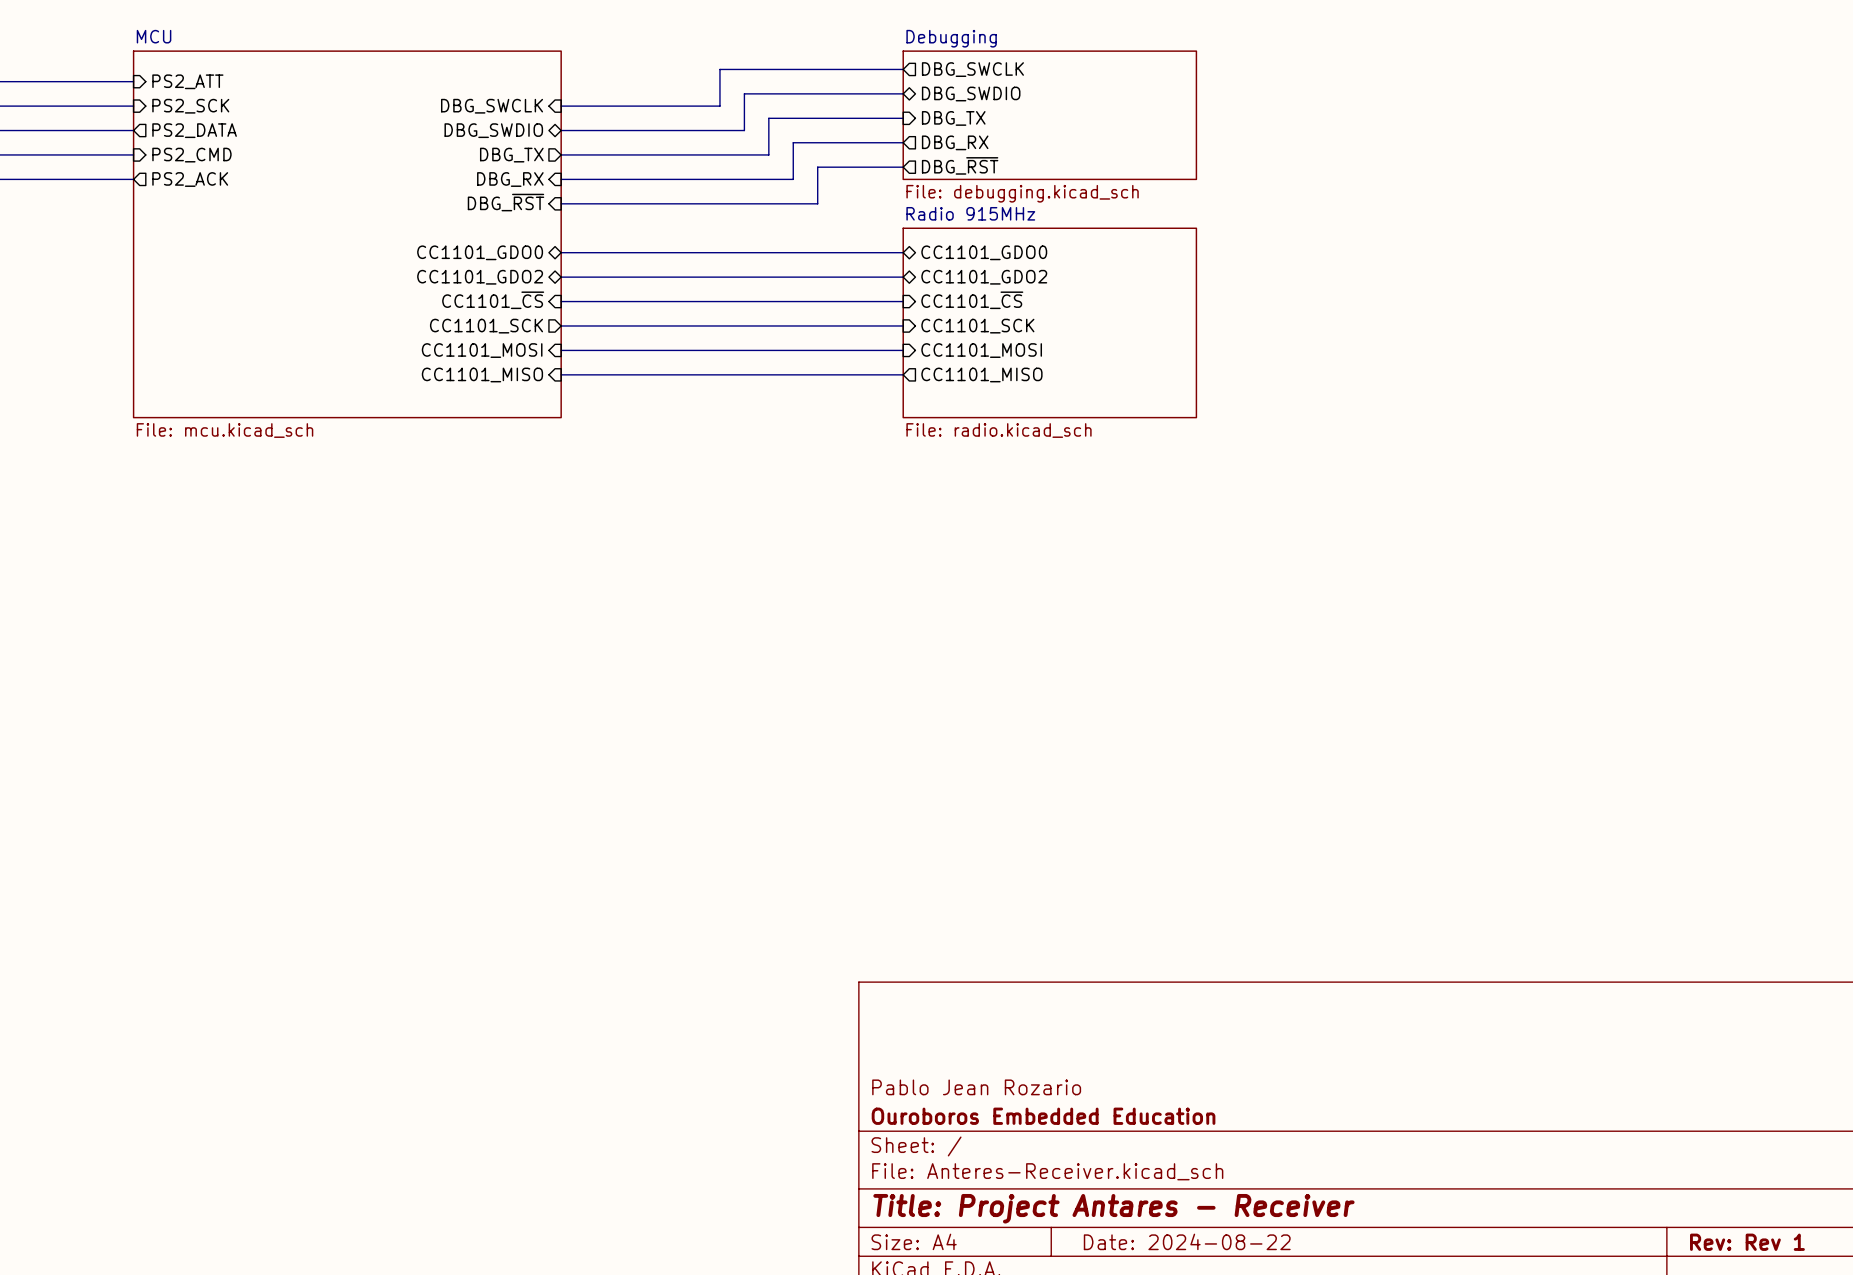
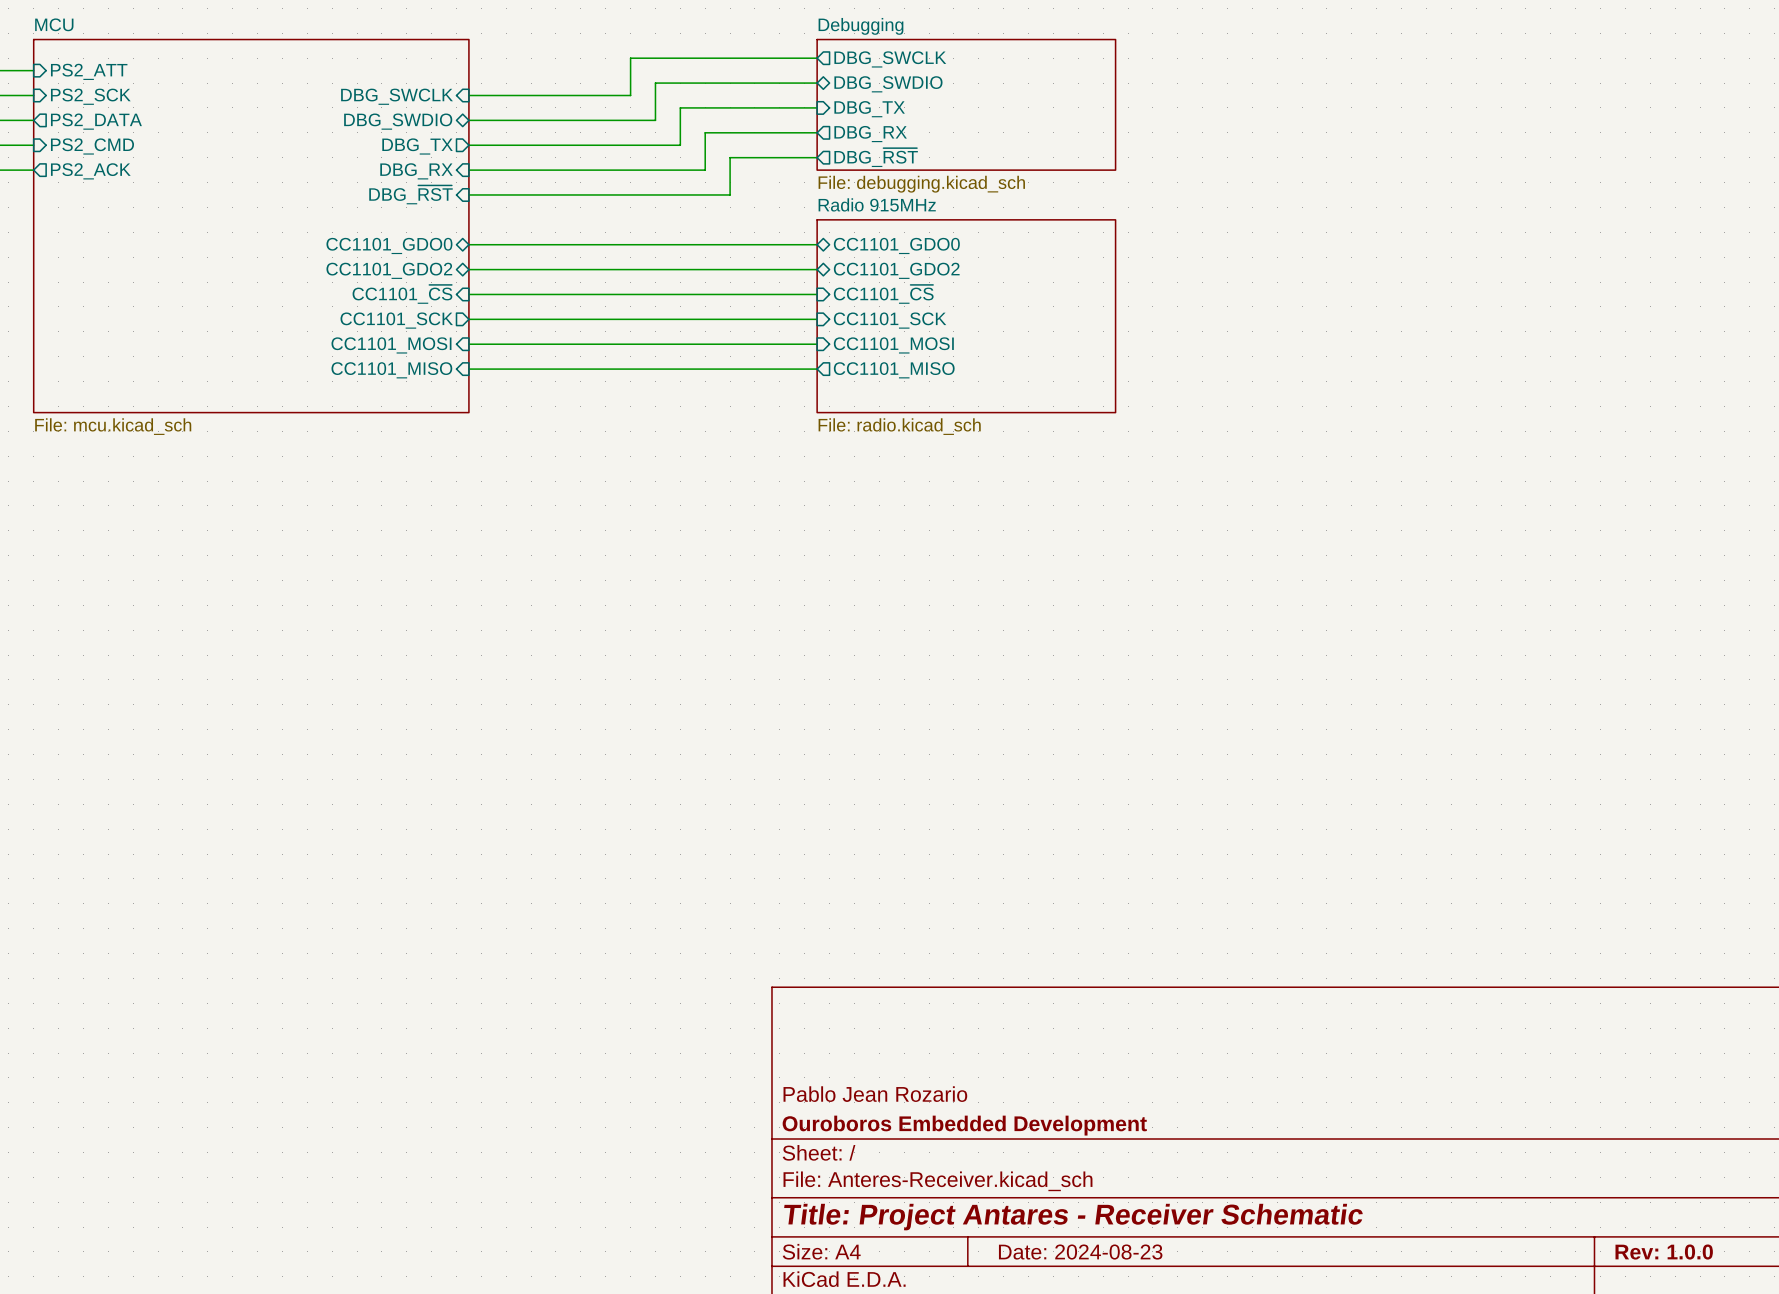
title block: Ouroboros Embedded Education (1043, 1116) -> Ouroboros Embedded Development (964, 1125)
title block: Title: Project Antares - Receiver (1113, 1208) -> Title: Project Antares - Receiver Schematic (1073, 1217)
title block: Date: 2024-08-22 (1187, 1241) -> Date: 2024-08-23 (1080, 1252)
title block: Rev: Rev 1 (1747, 1242) -> Rev: 1.0.0 (1664, 1252)

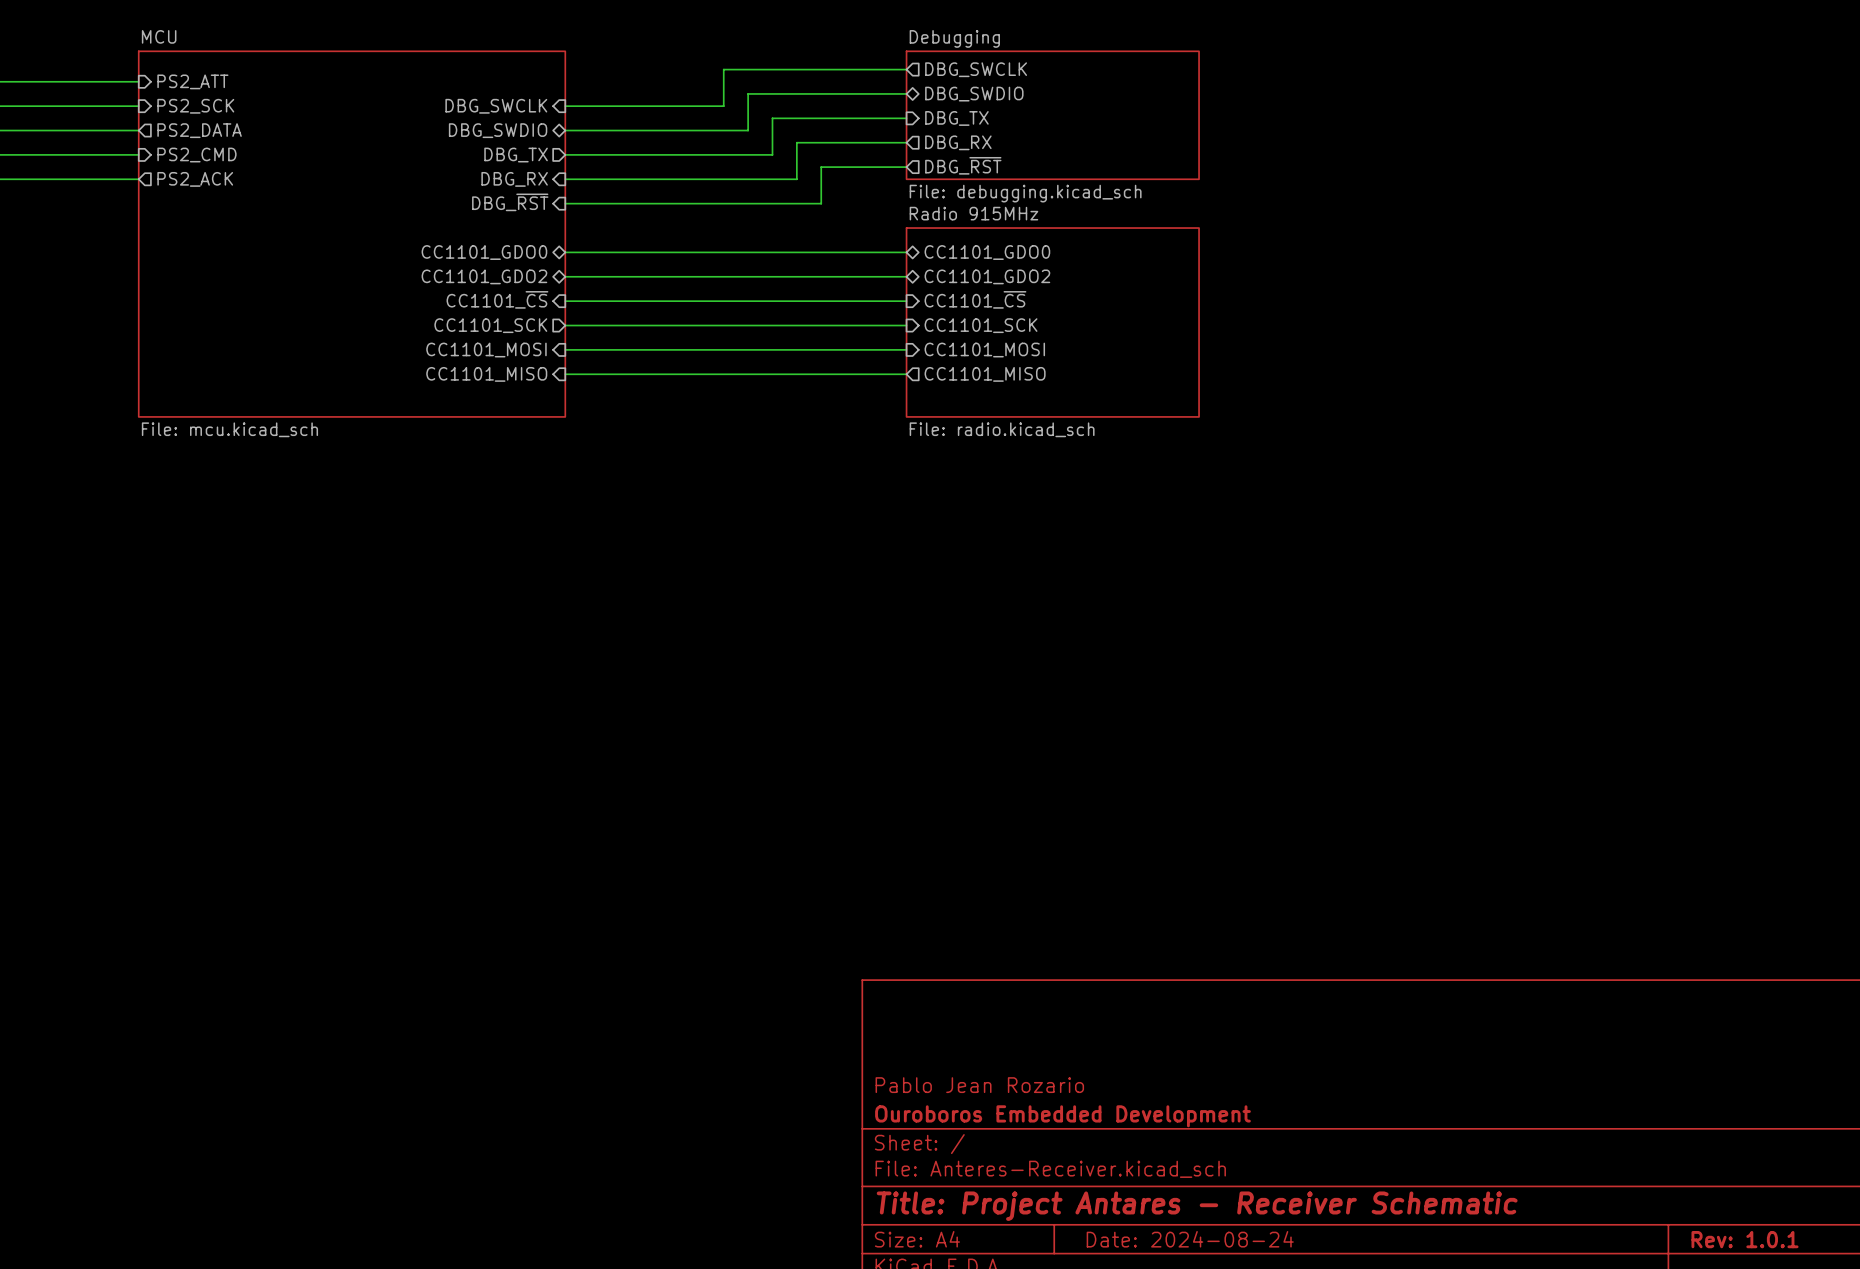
title block: Date: 2024-08-23 (1080, 1252) -> Date: 2024-08-24 (1190, 1239)
title block: Rev: 1.0.0 (1664, 1252) -> Rev: 1.0.1 (1745, 1239)

